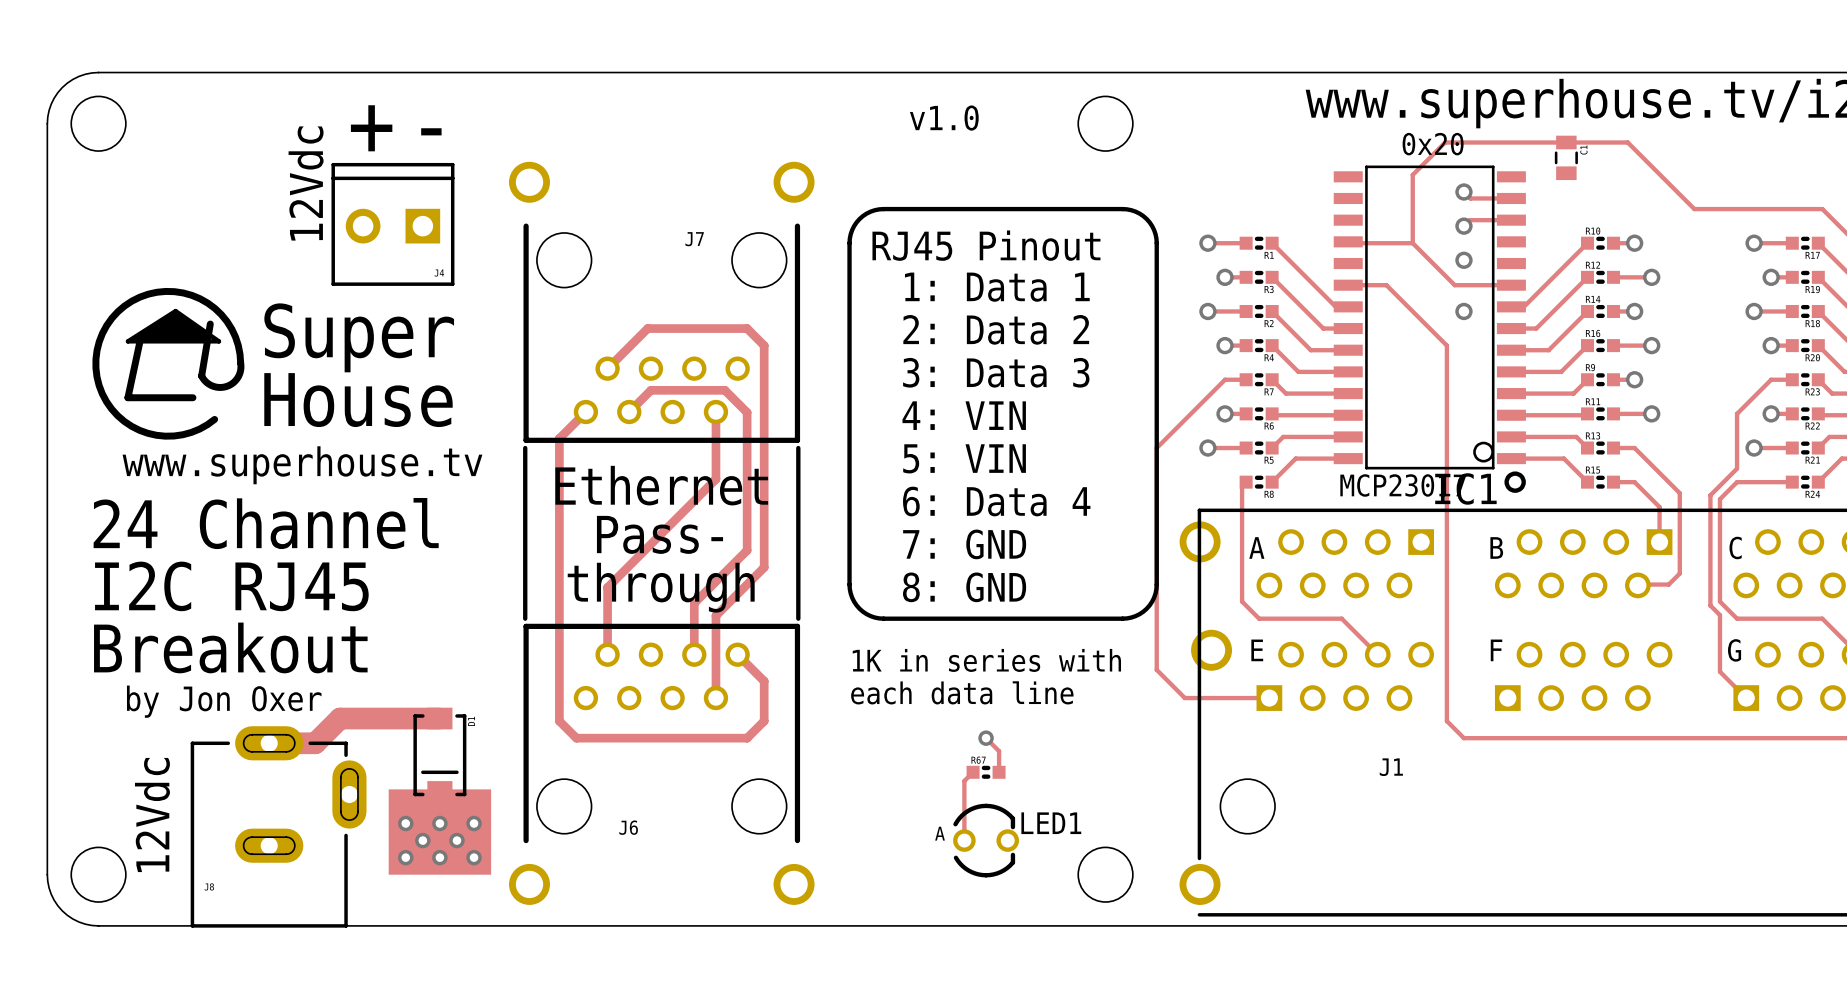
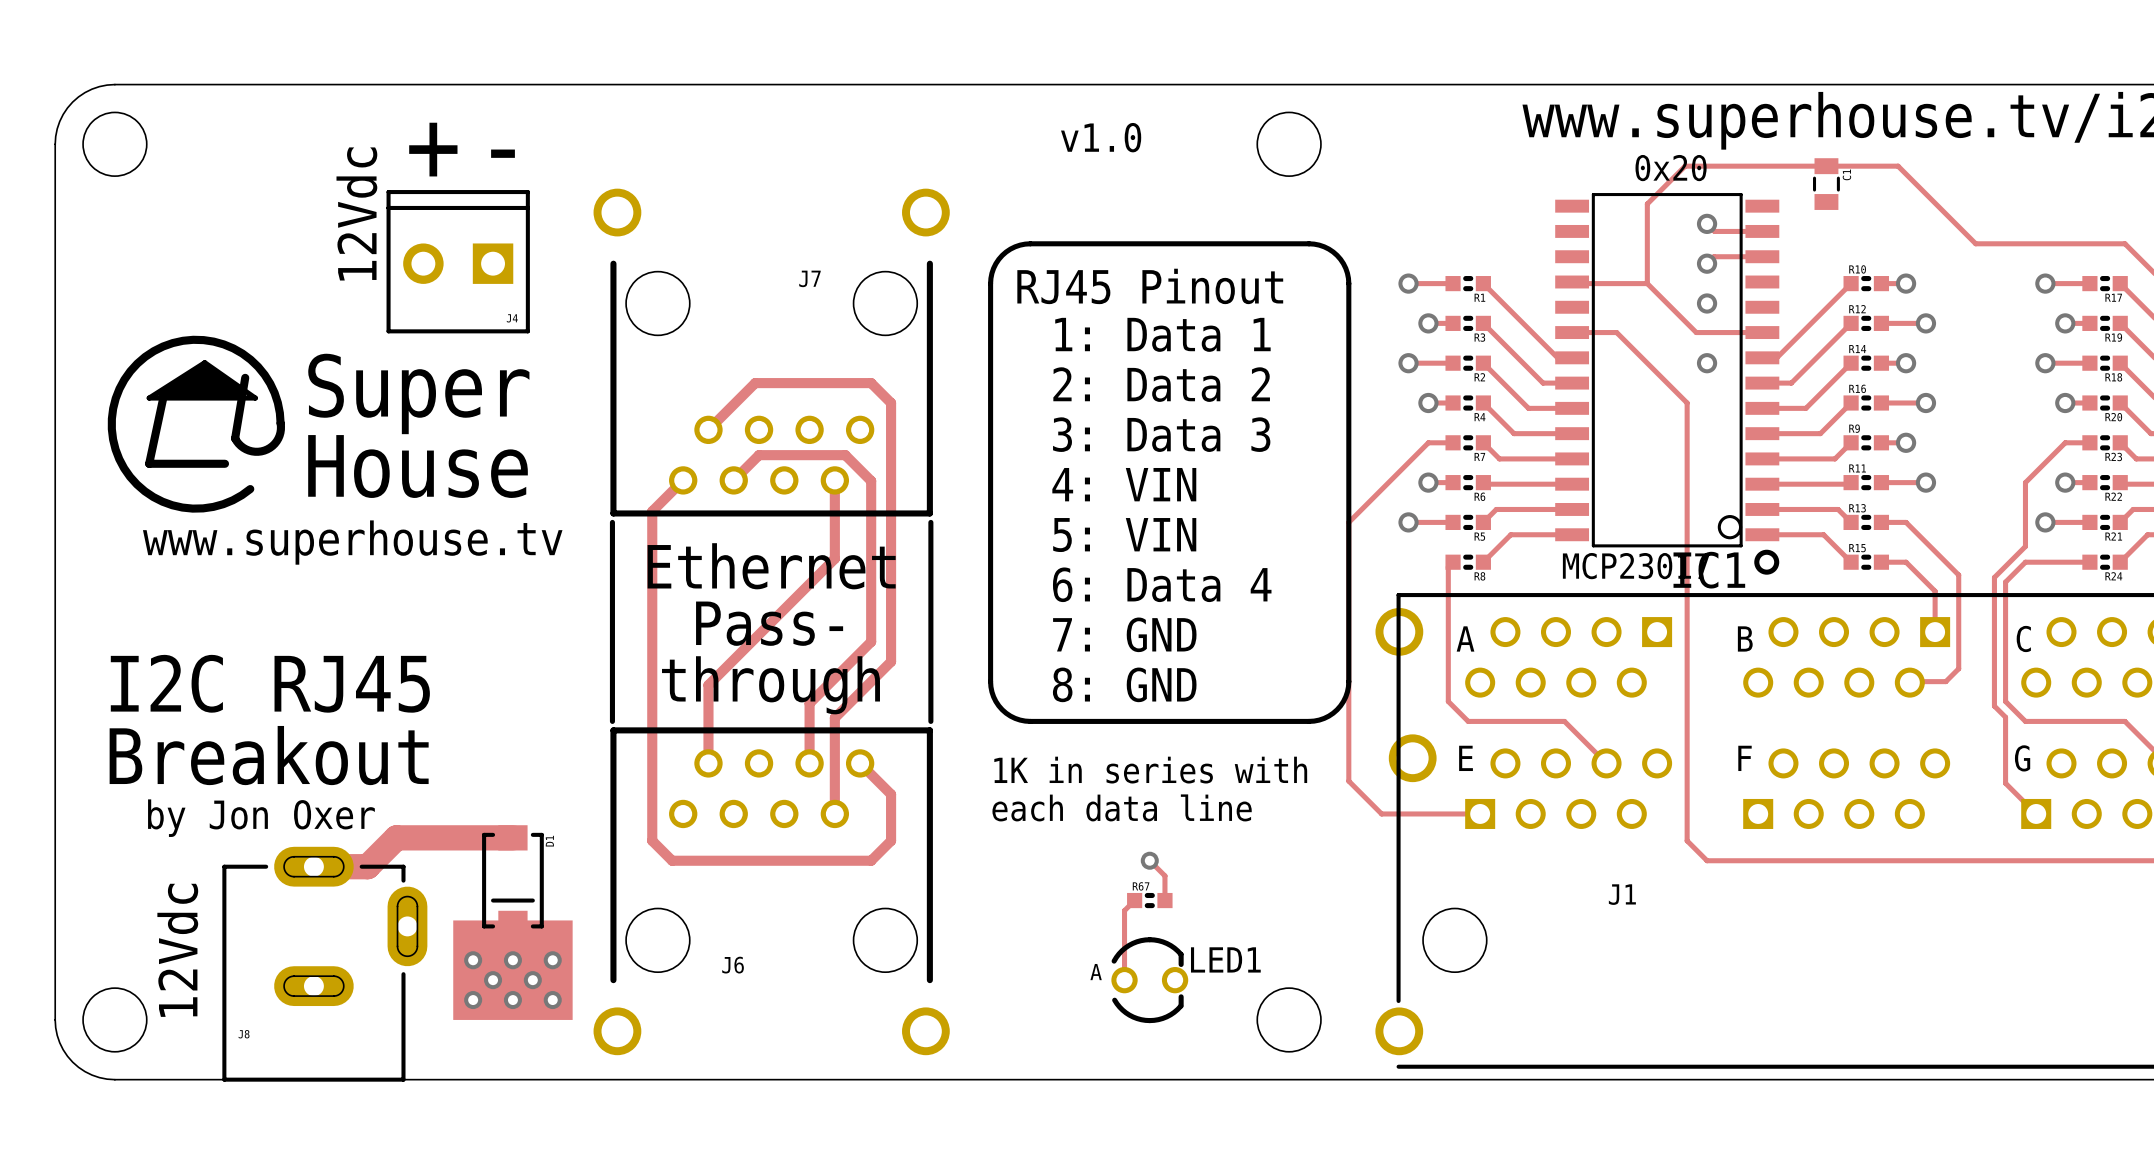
text: 24 Channel (266, 523) -> none

